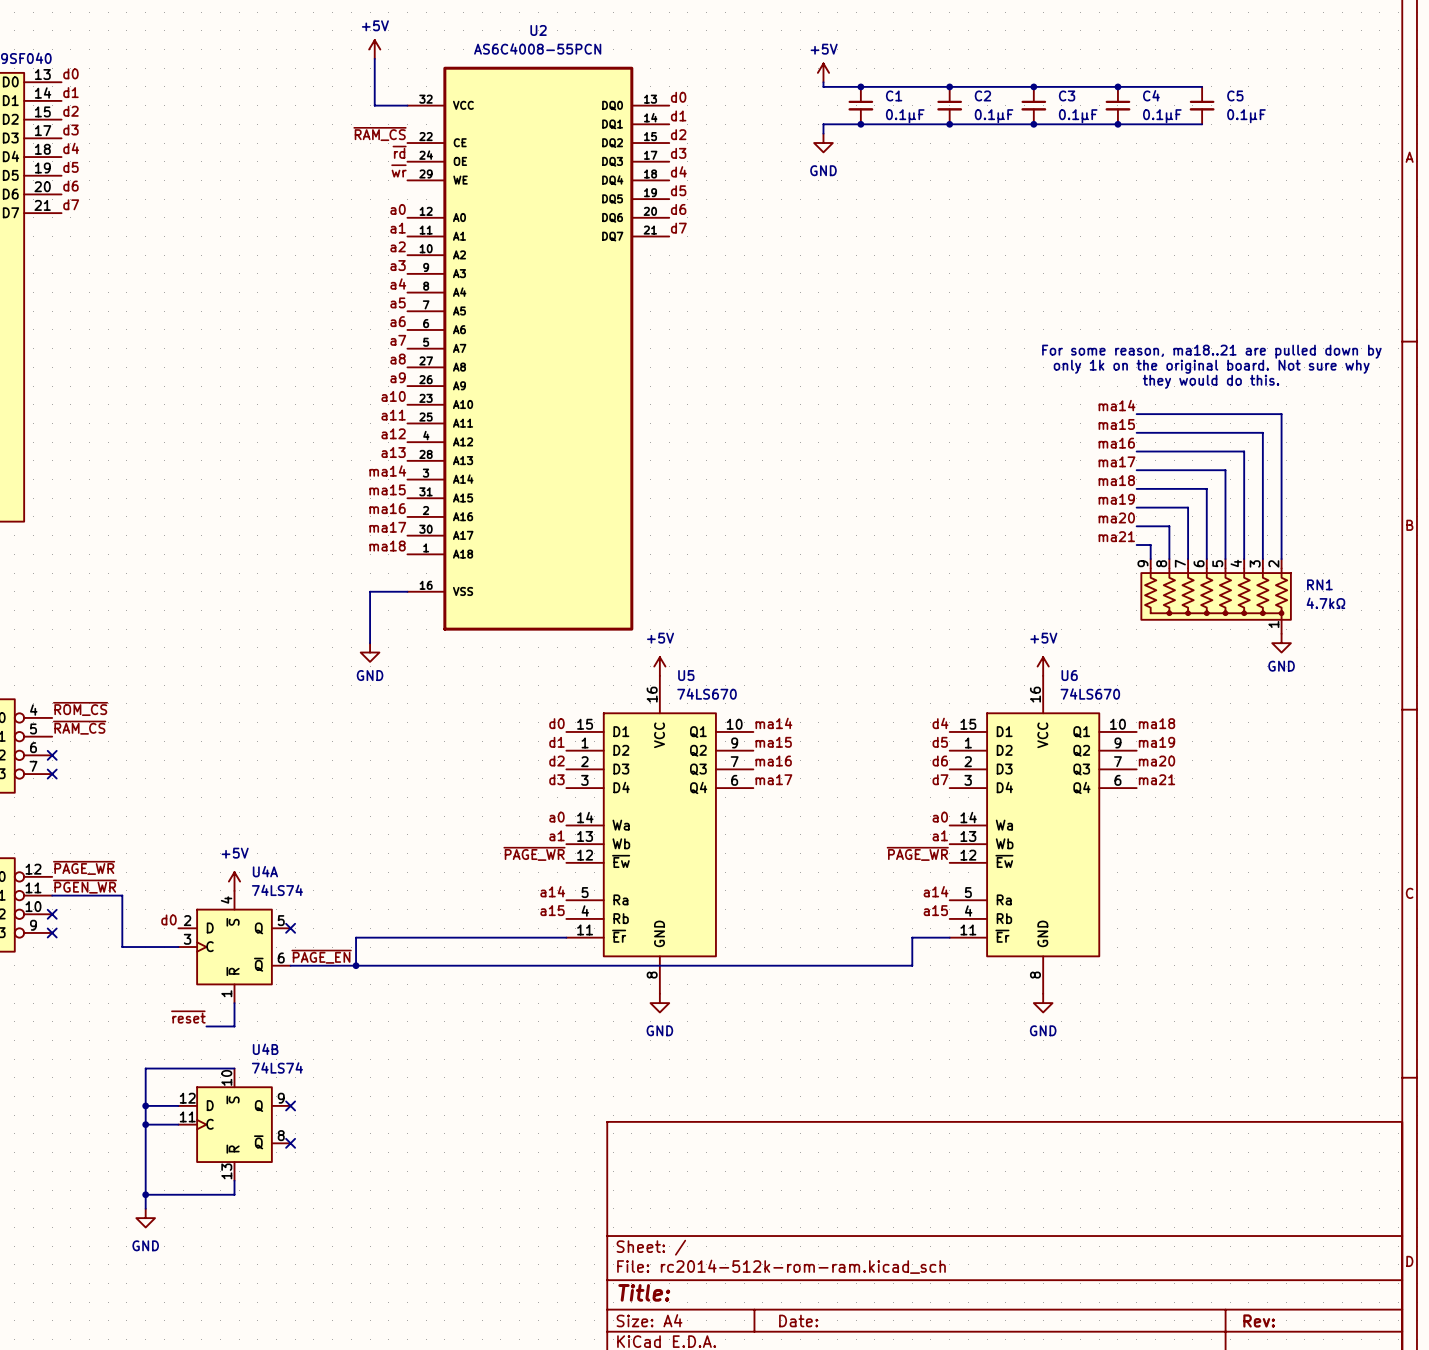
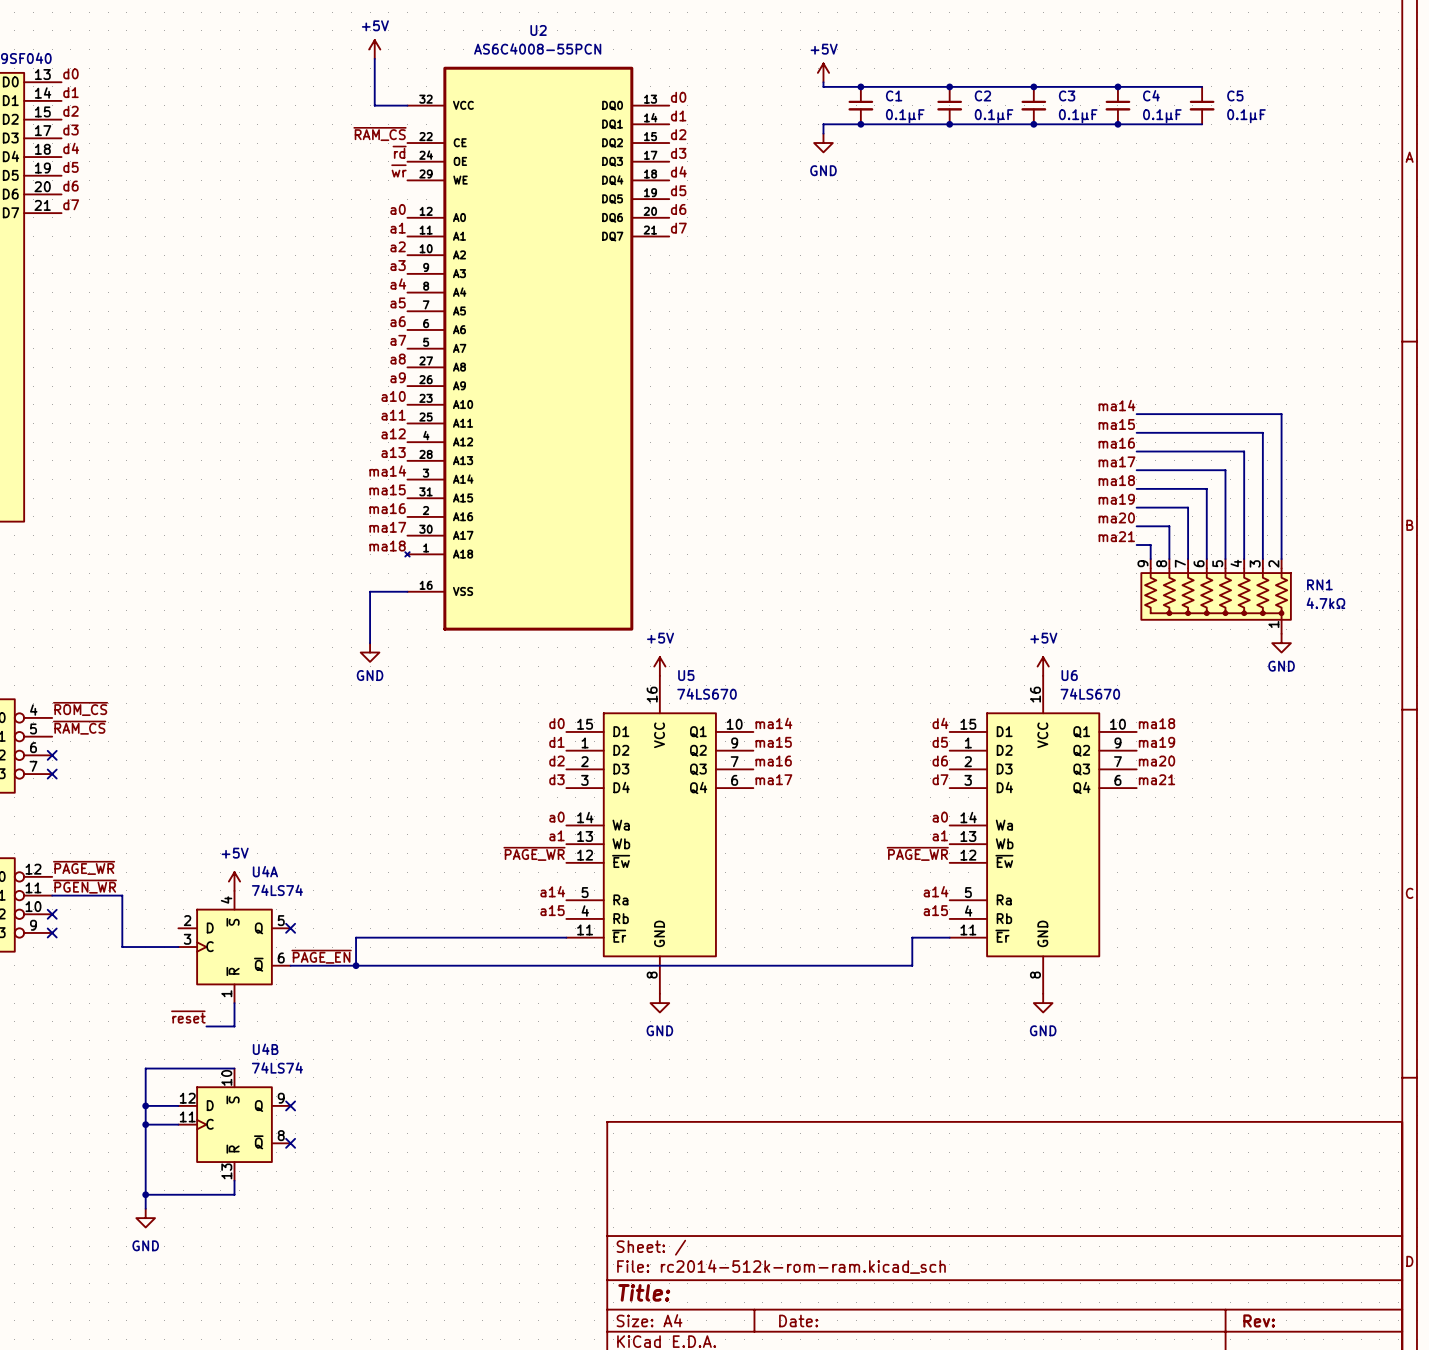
U2 symbol: [407, 66, 670, 631] -> [405, 66, 670, 631]
text: For some reason, ma18..21 are pulled down by (1211, 351) -> none
text: only 1k on the original board. Not sure why (1211, 366) -> none
text: they would do this. (1211, 381) -> none
label: d0 (168, 919) -> none

